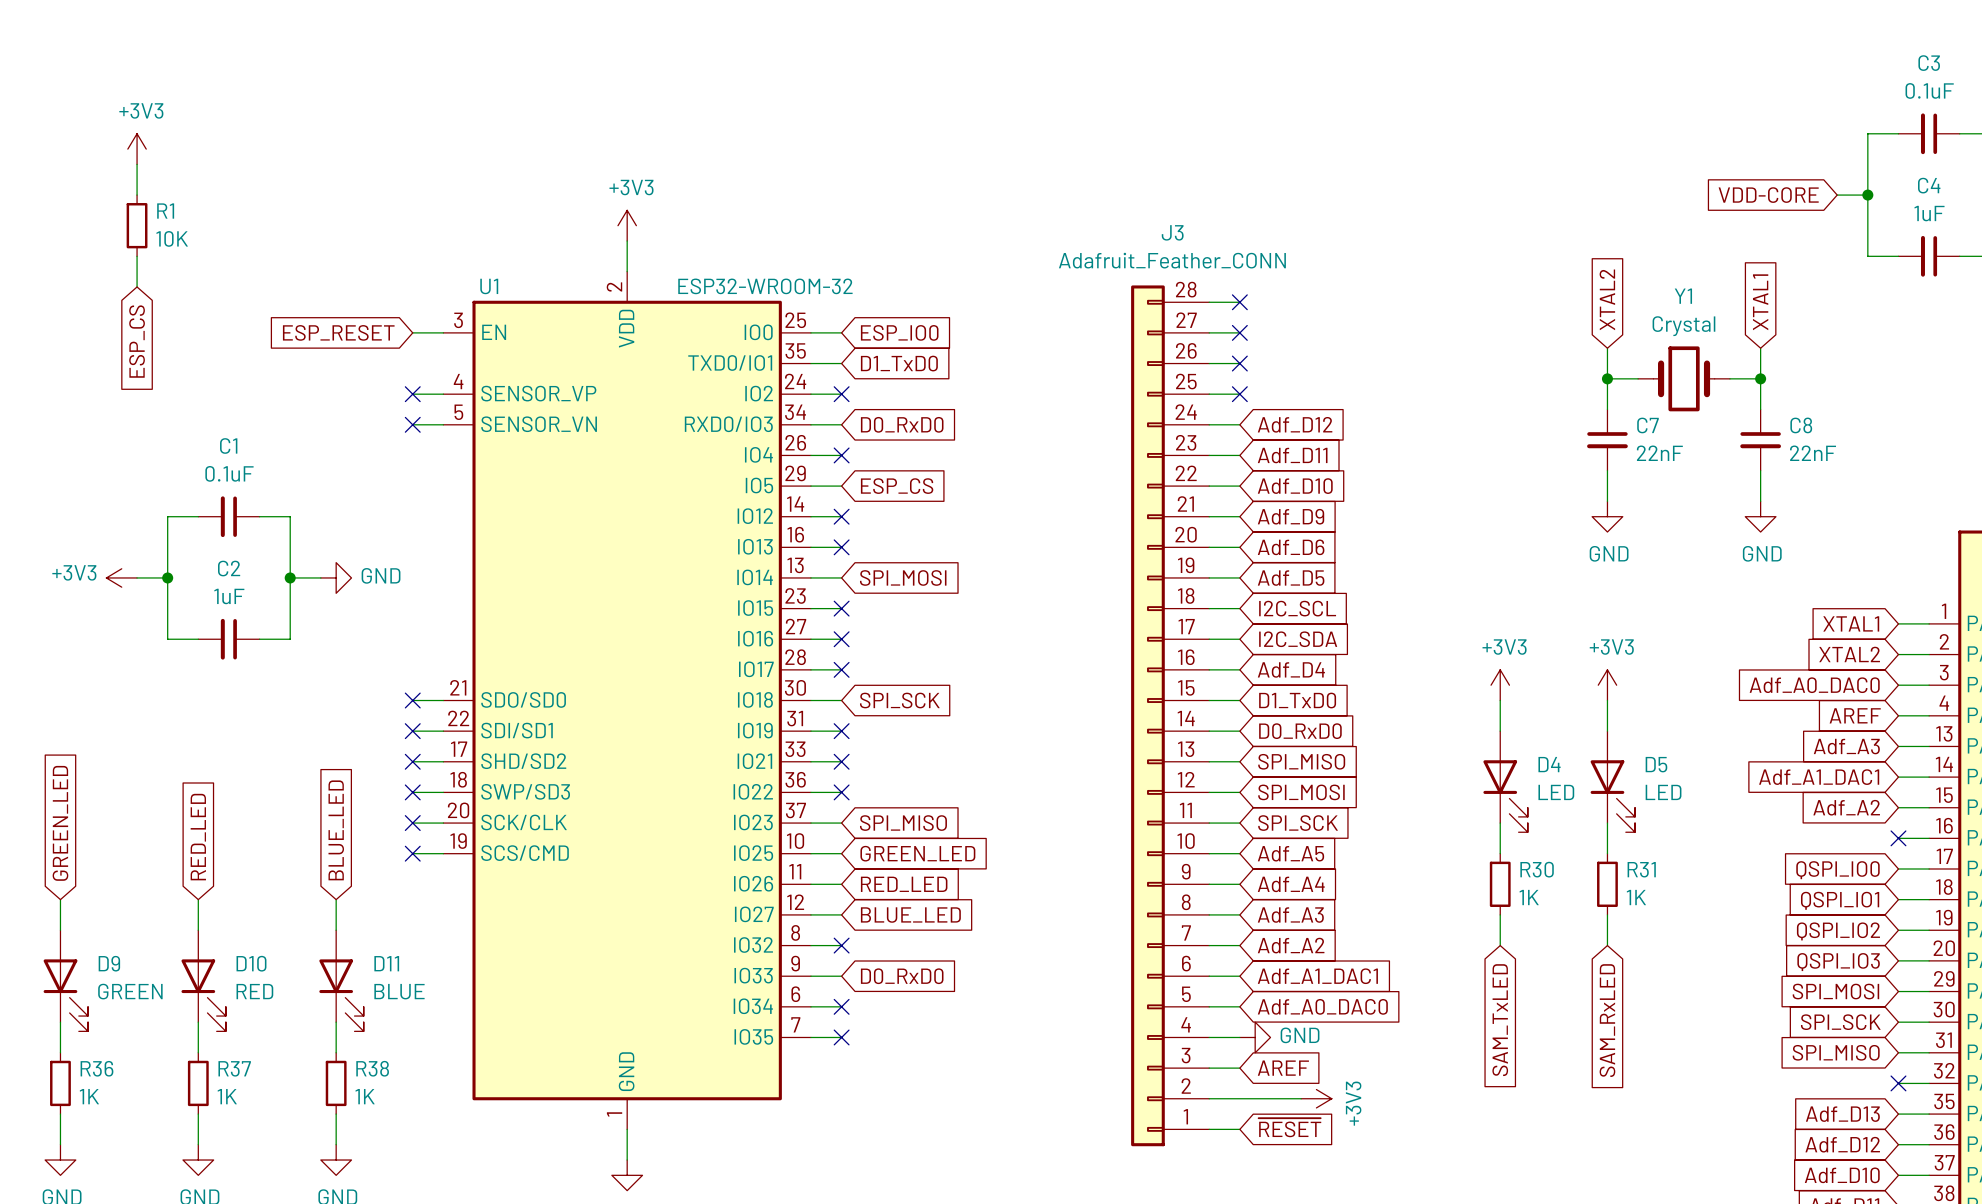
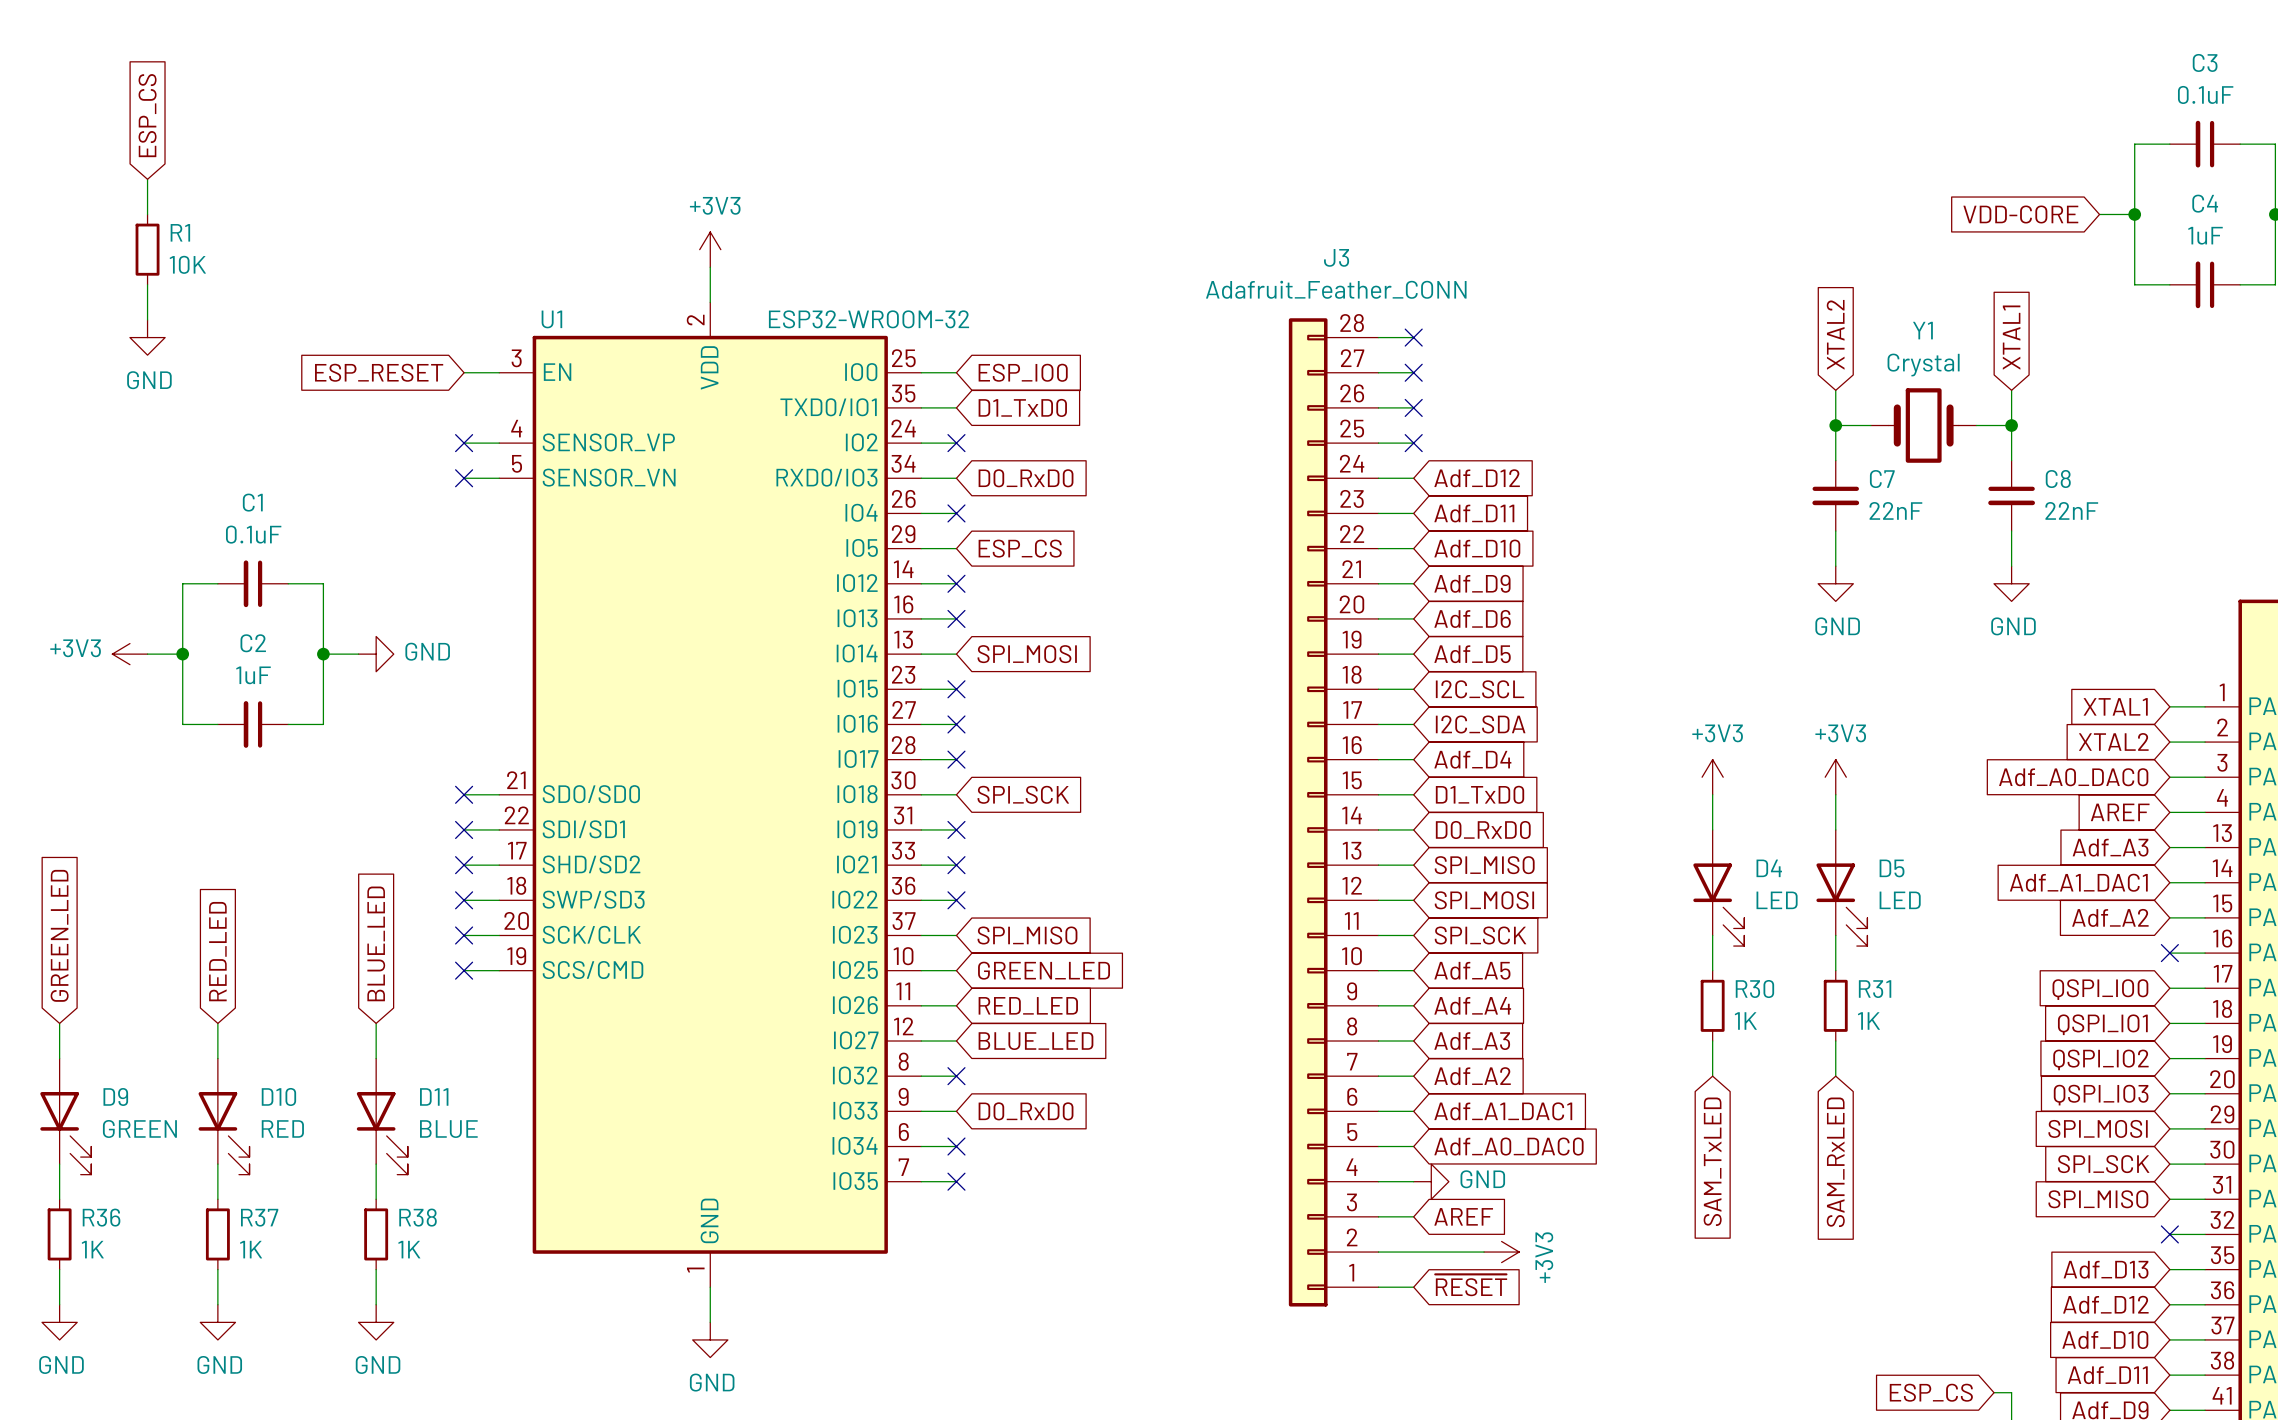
power symbol: +3V3 (137, 149) -> none
power symbol: none -> GND (147, 337)
global label rotation: 0° (137, 341) -> 180° (147, 115)
global label position: ESP_CS (137, 341) -> ESP_CS (147, 115)

